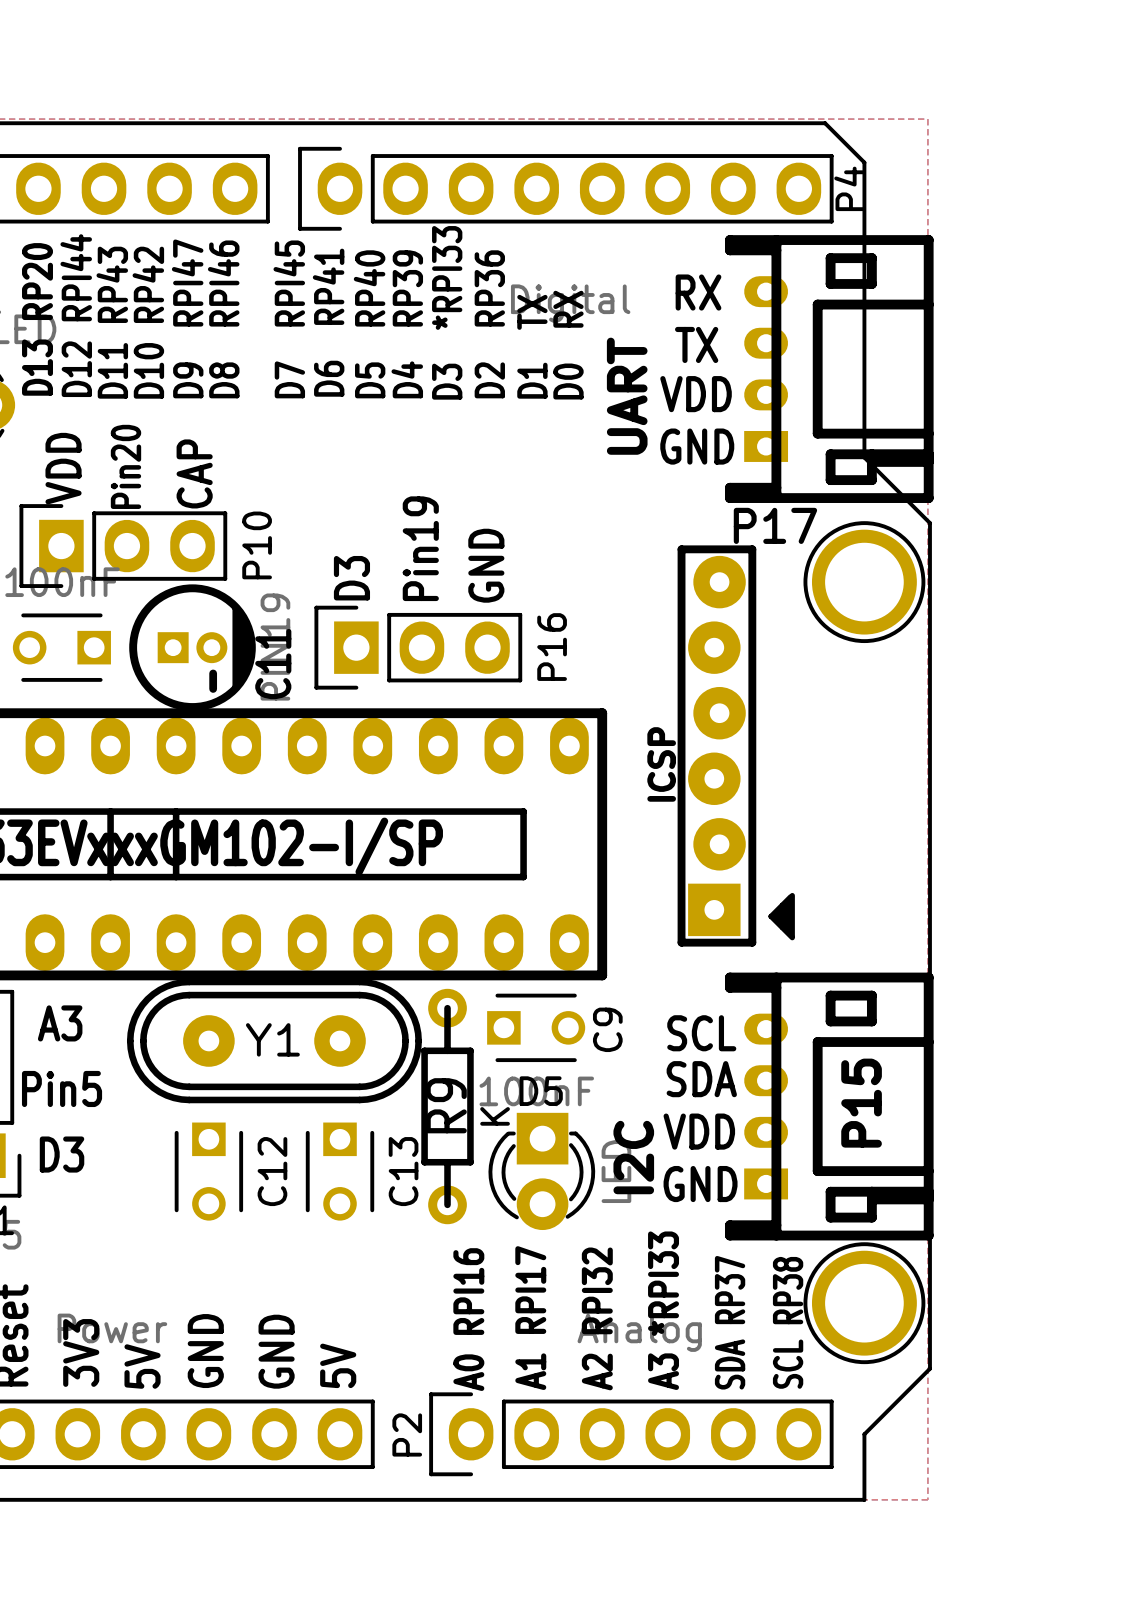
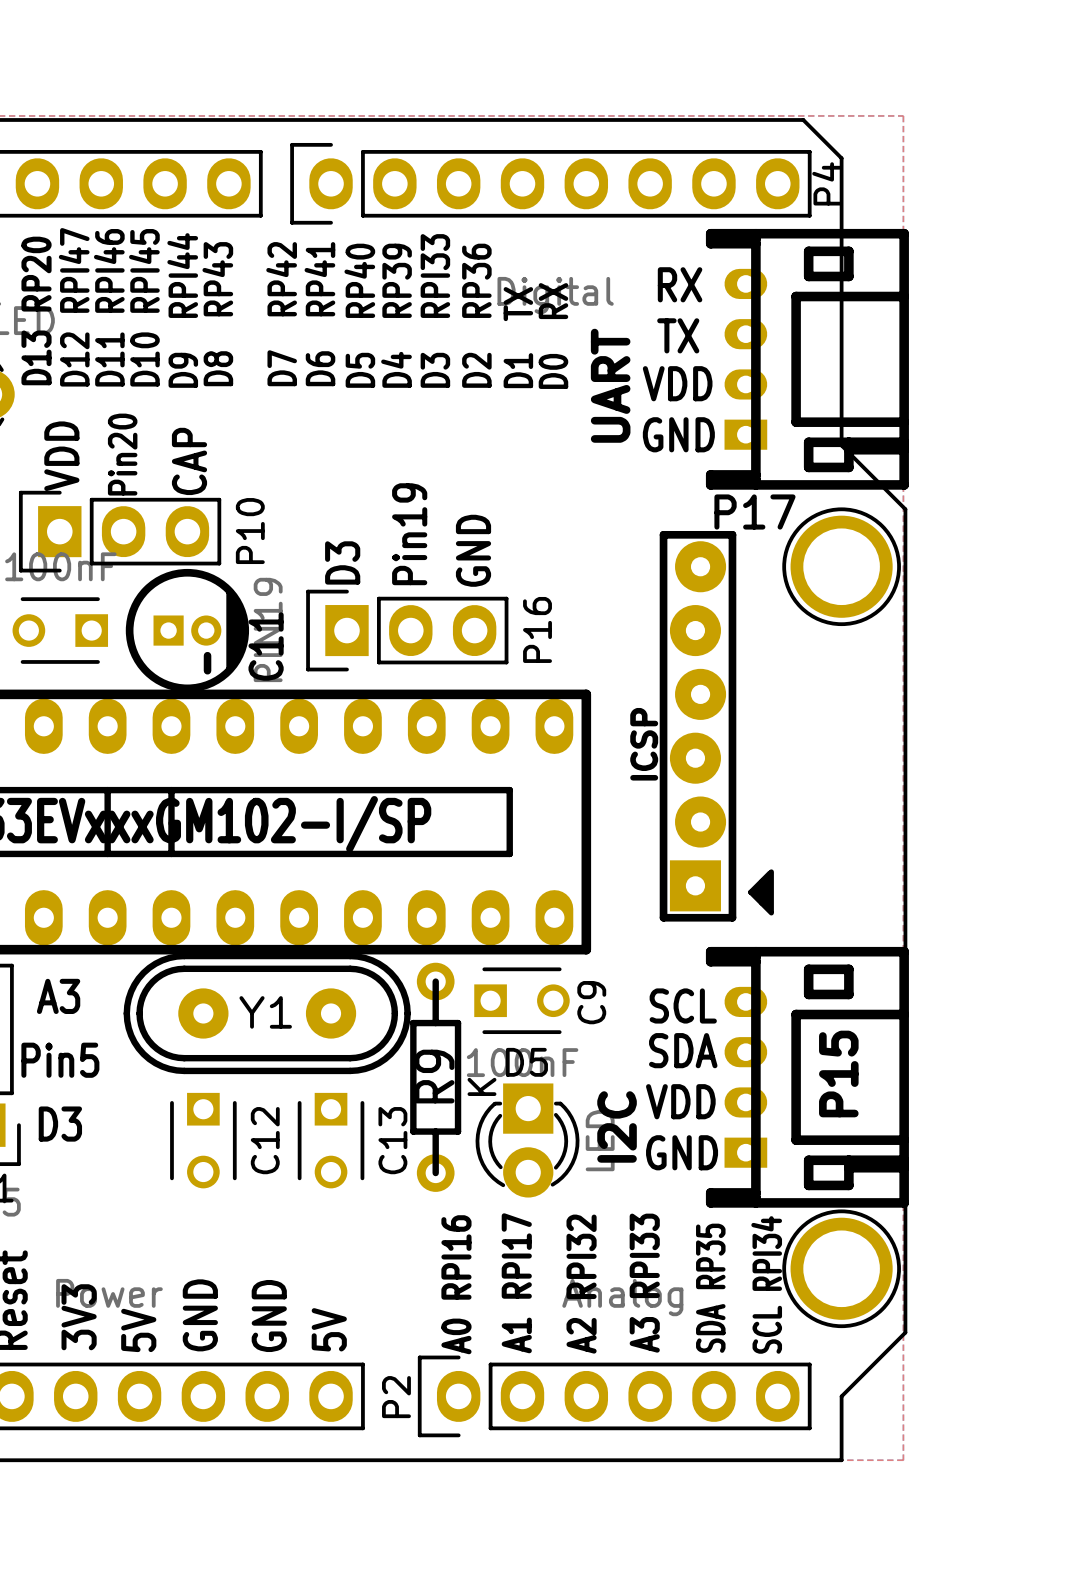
text: D3 *RPI33 (447, 312) -> D3 RPI33 (435, 310)
text: D12 RPI44 (76, 315) -> D12 RPI47 (74, 307)
text: D9 RPI47 (187, 318) -> D9 RPI44 (182, 310)
text: D8 RPI46 (223, 319) -> D8 RP43 (217, 314)
text: D7 RPI45 (289, 319) -> D7 RP42 (281, 314)
text: D11 RP43 (112, 322) -> D11 RPI46 (109, 307)
text: D10 RP42 (148, 322) -> D10 RPI45 (144, 307)
text: A3 *RPI33 (663, 1310) -> A3 RPI33 (644, 1283)
text: SDA RP37 (730, 1322) -> SDA RP35 (710, 1288)
text: SCL RP38 (788, 1322) -> SCL RPI34 (766, 1284)

